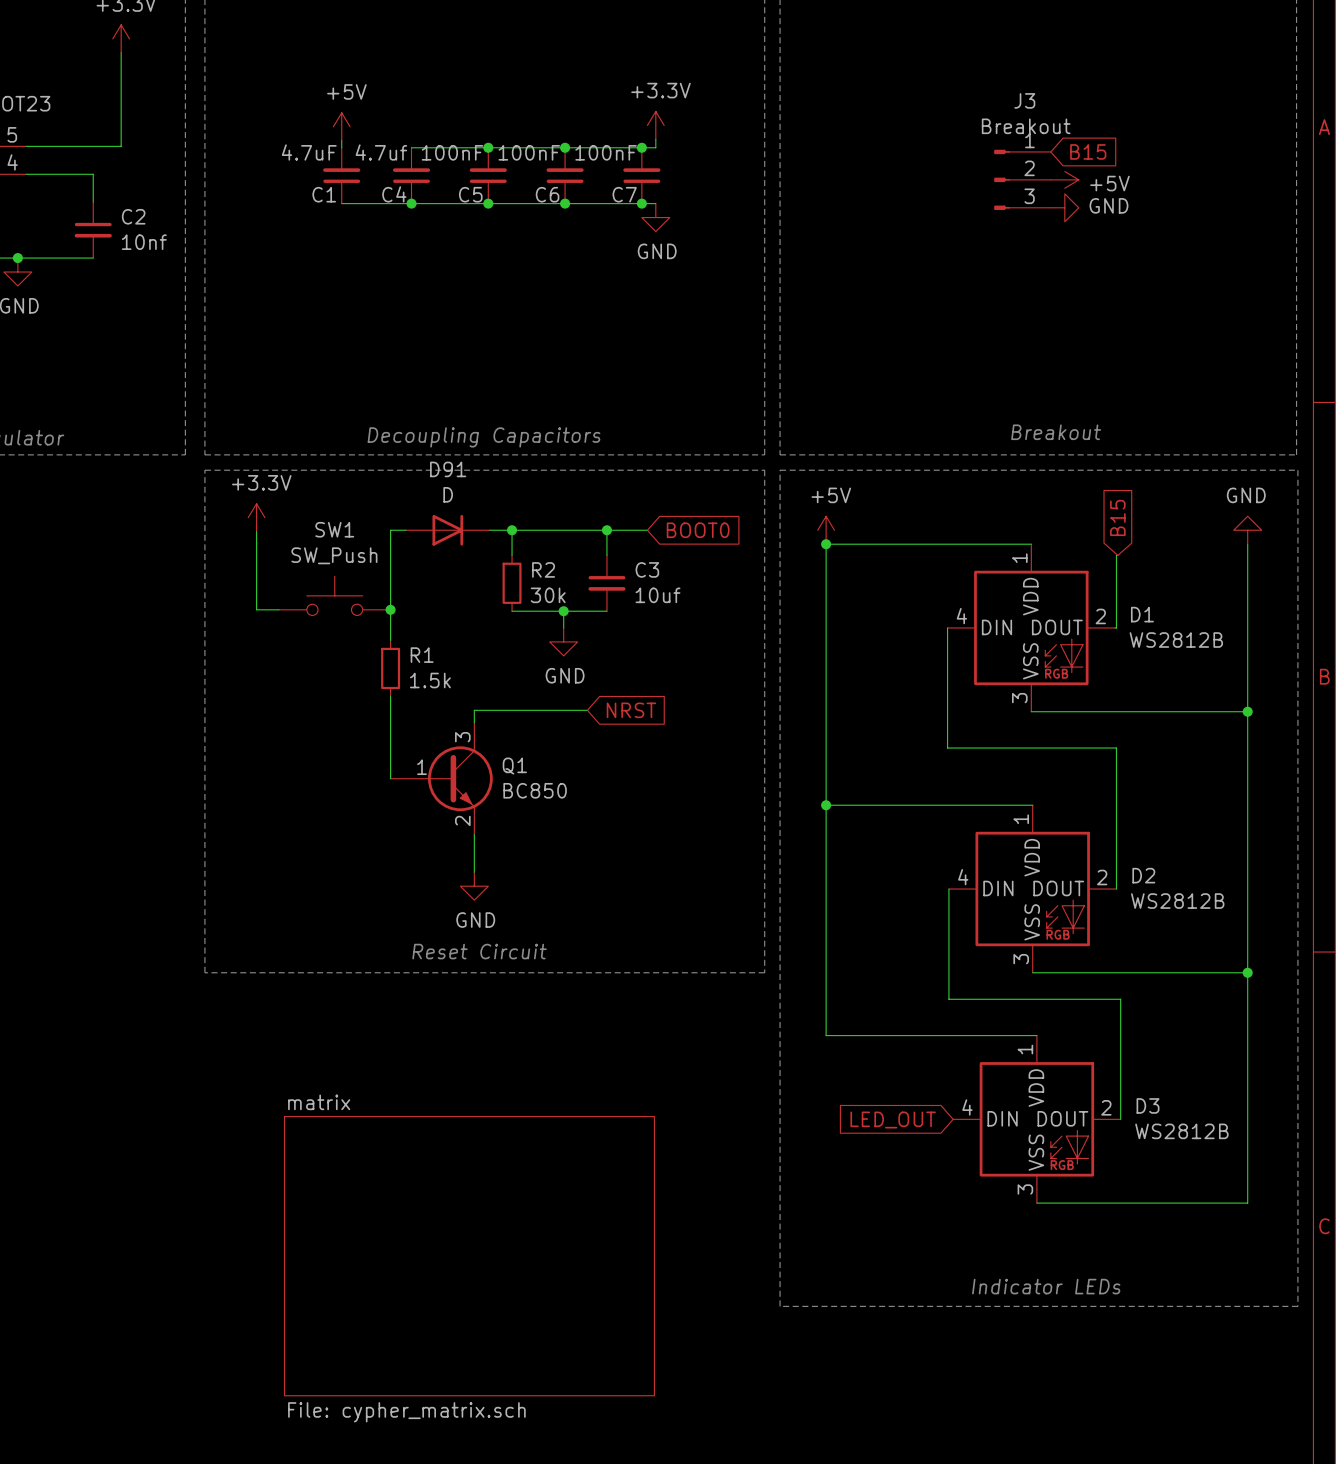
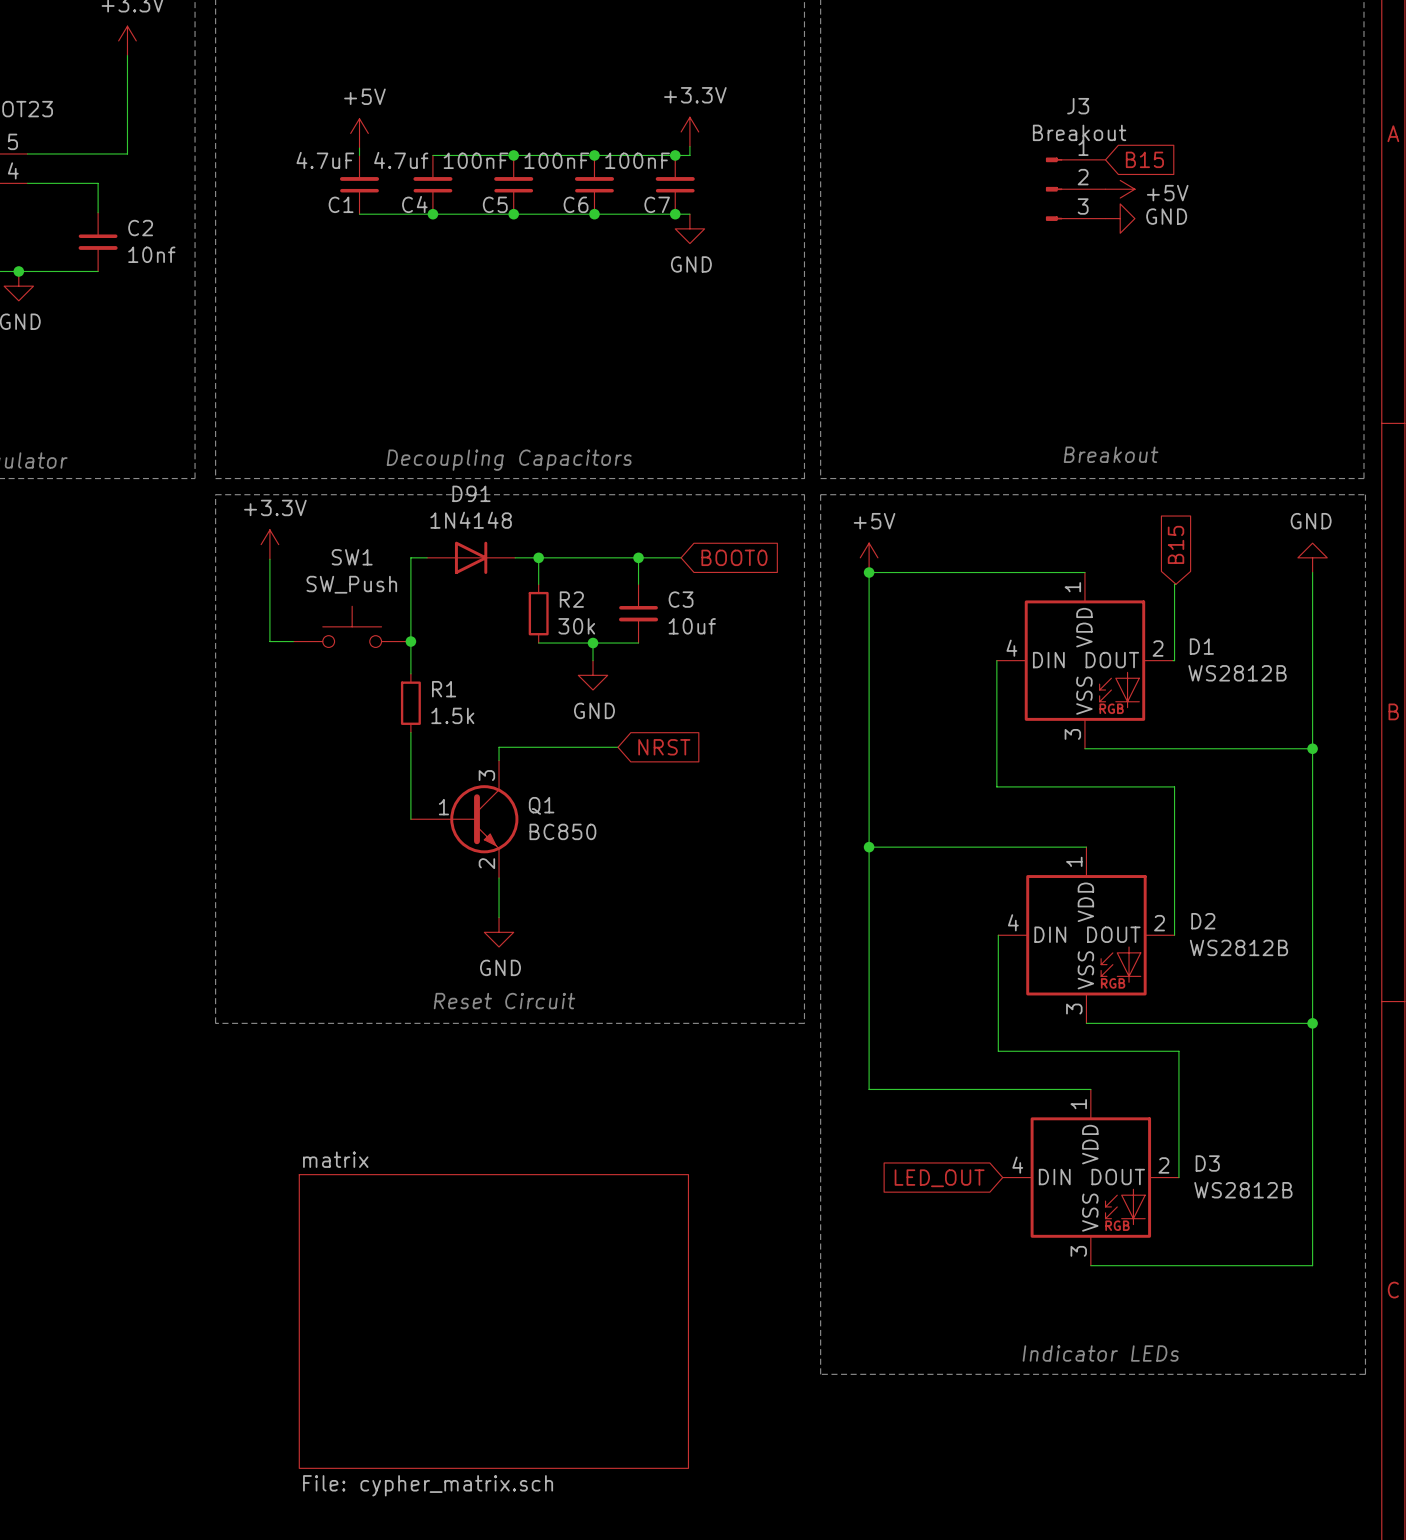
D91 value: D (448, 494) -> 1N4148 (471, 520)

